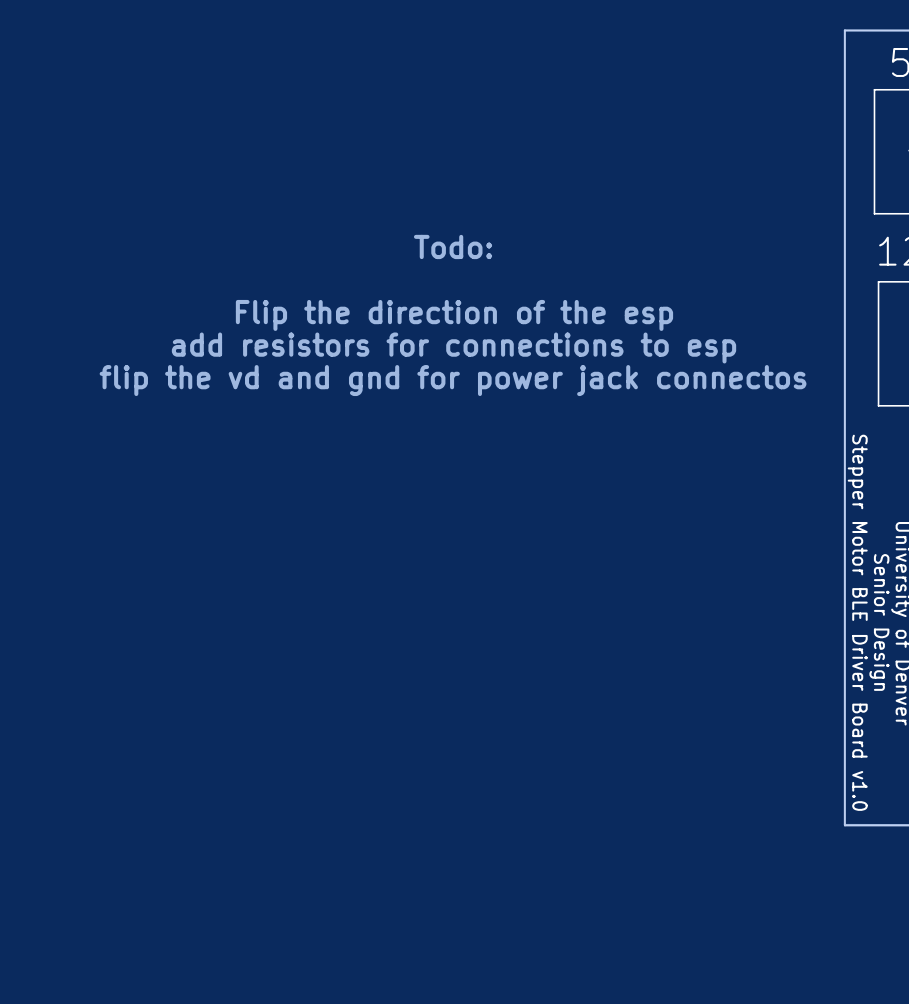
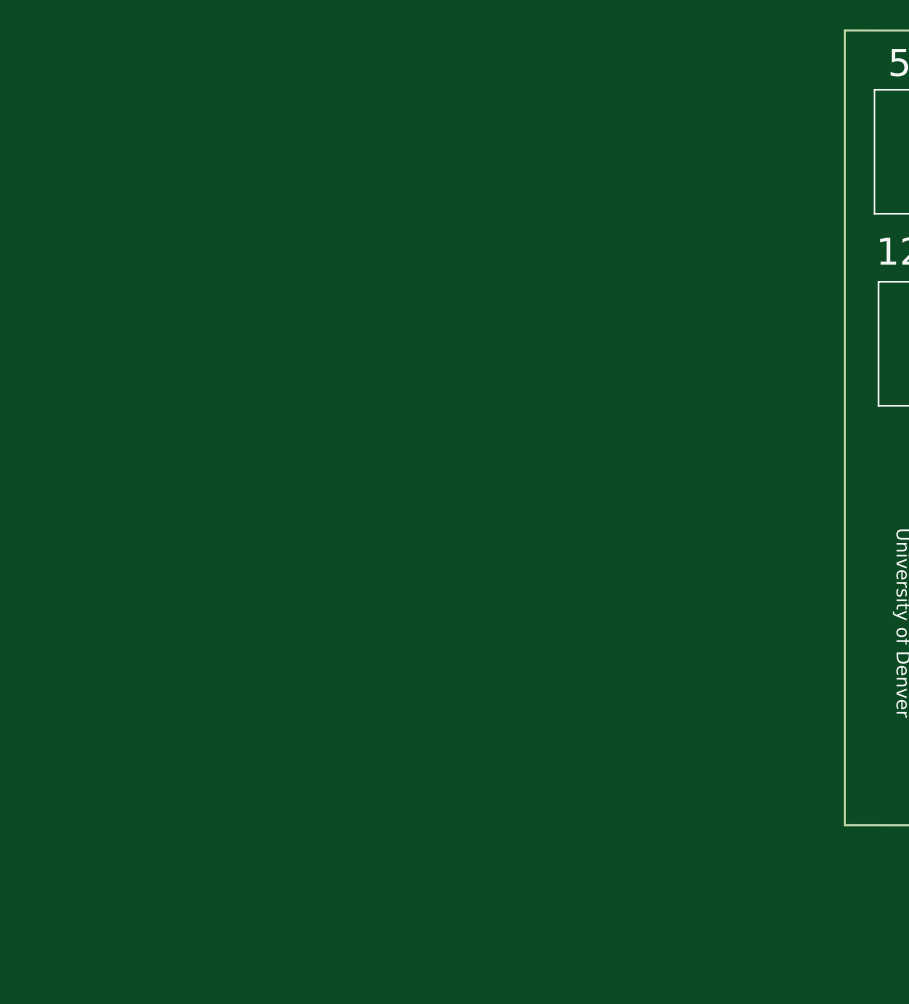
text: Todo: (453, 246) -> none
text: Flip the direction of the esp (454, 315) -> none
text: add resistors for connections to esp (454, 347) -> none
text: flip the vd and gnd for power jack connectos (453, 380) -> none
text: Stepper Motor BLE Driver Board v1.0 (857, 622) -> none
text: Senior Design (879, 622) -> none

